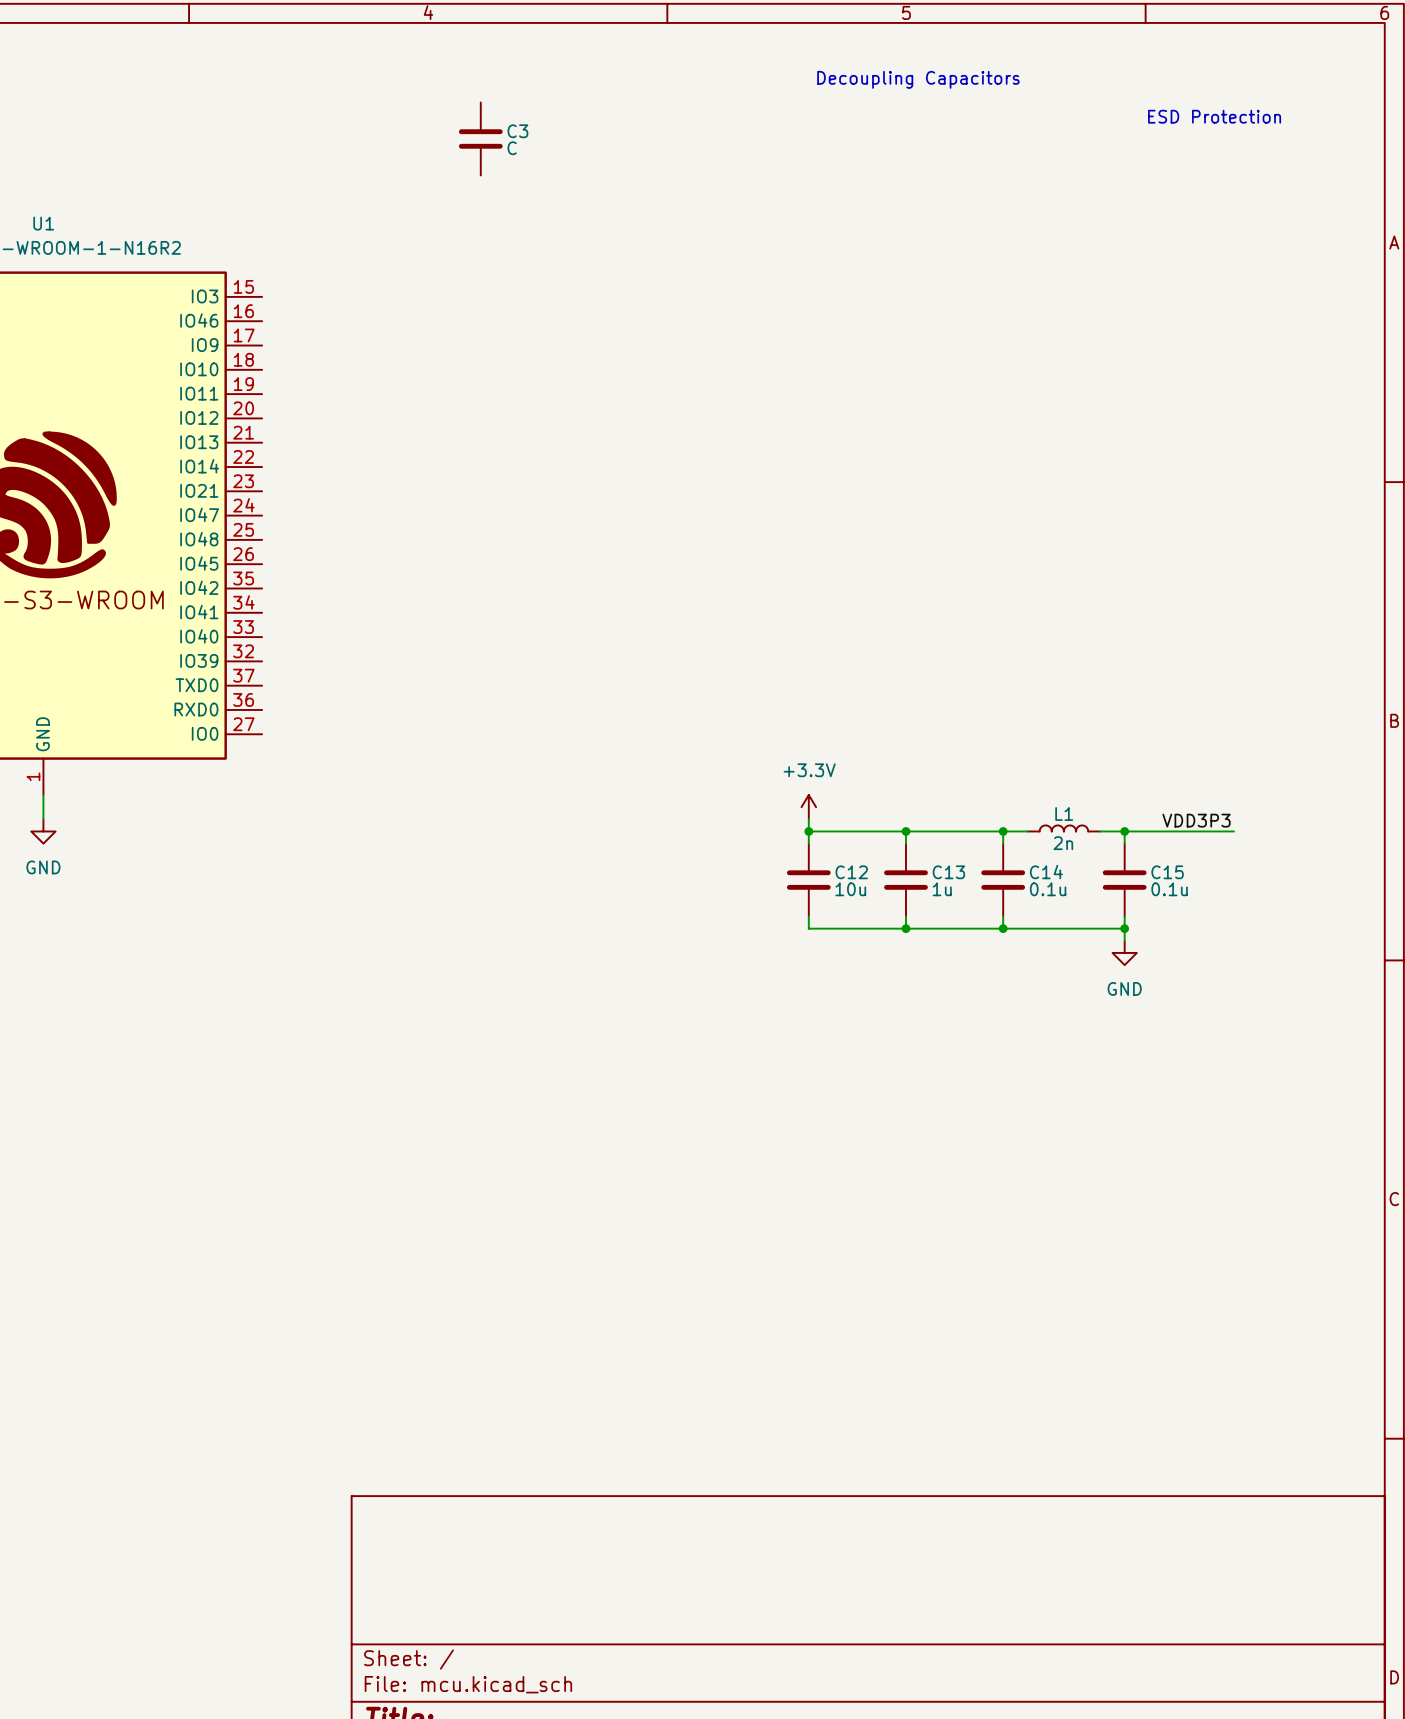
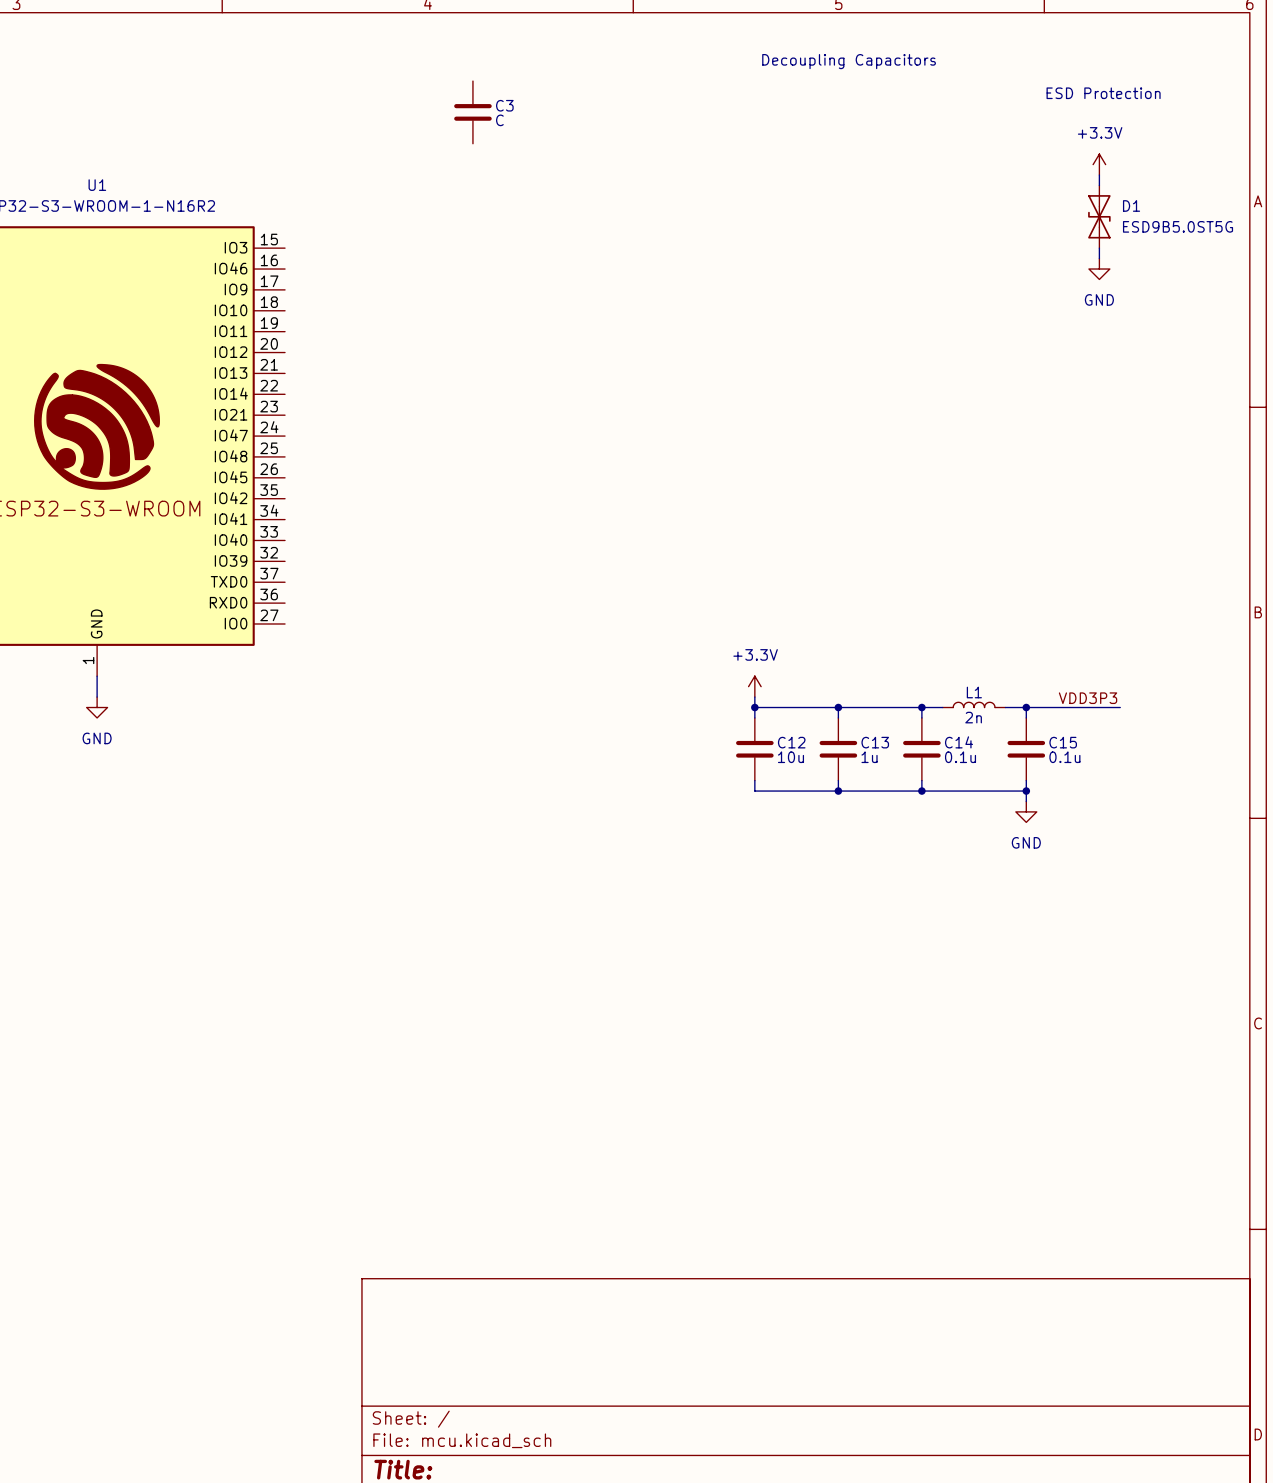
power symbol: none -> +3.3V (1099, 164)
wire: none -> (1099, 175) (1099, 185)
D1: none -> ESD9B5.0ST5G (1099, 216)
wire: none -> (1099, 248) (1099, 258)
power symbol: none -> GND (1099, 269)

